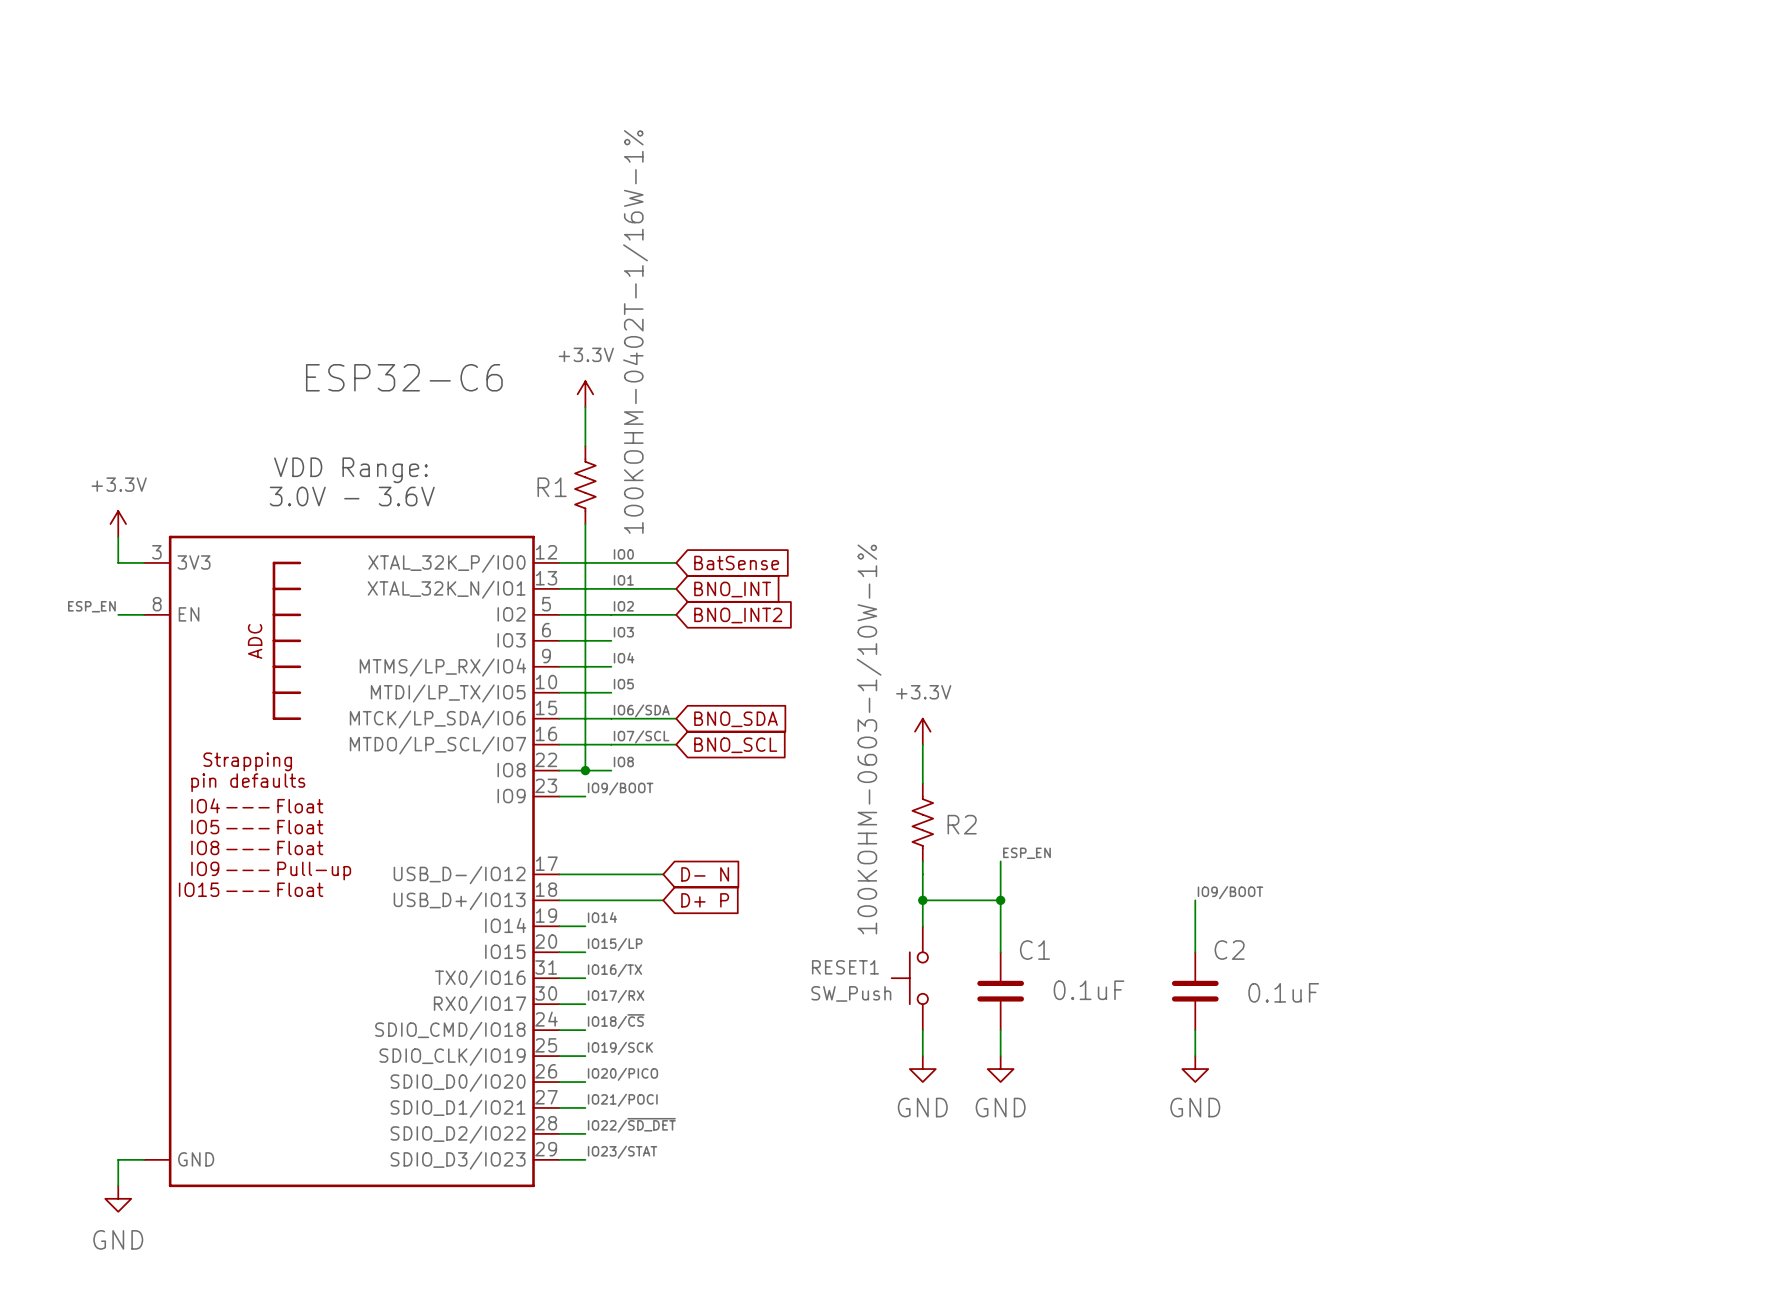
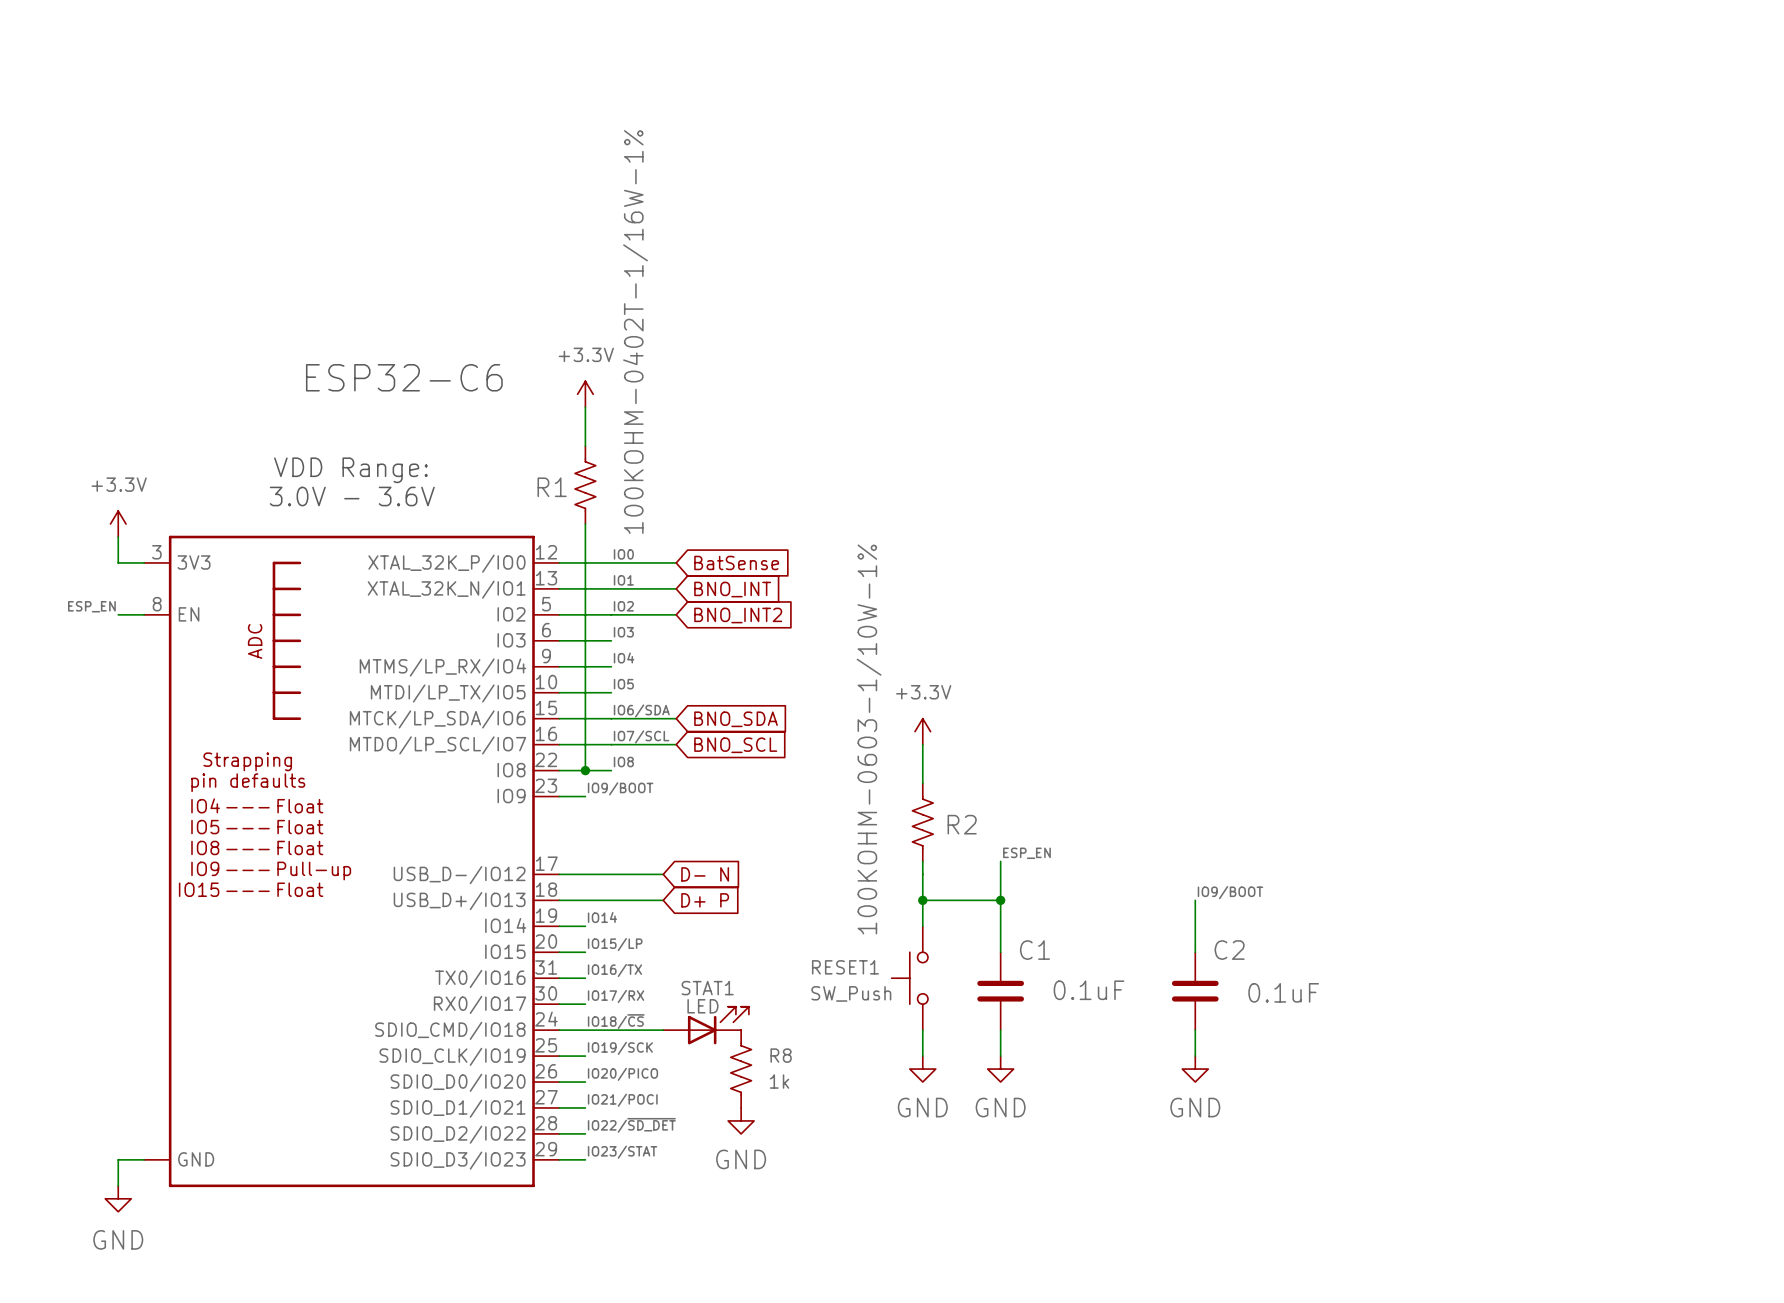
STAT1: none -> LED (706, 1025)
wire: none -> (585, 1030) (663, 1030)
R8: none -> 1k (741, 1069)
power symbol: none -> GND (741, 1120)

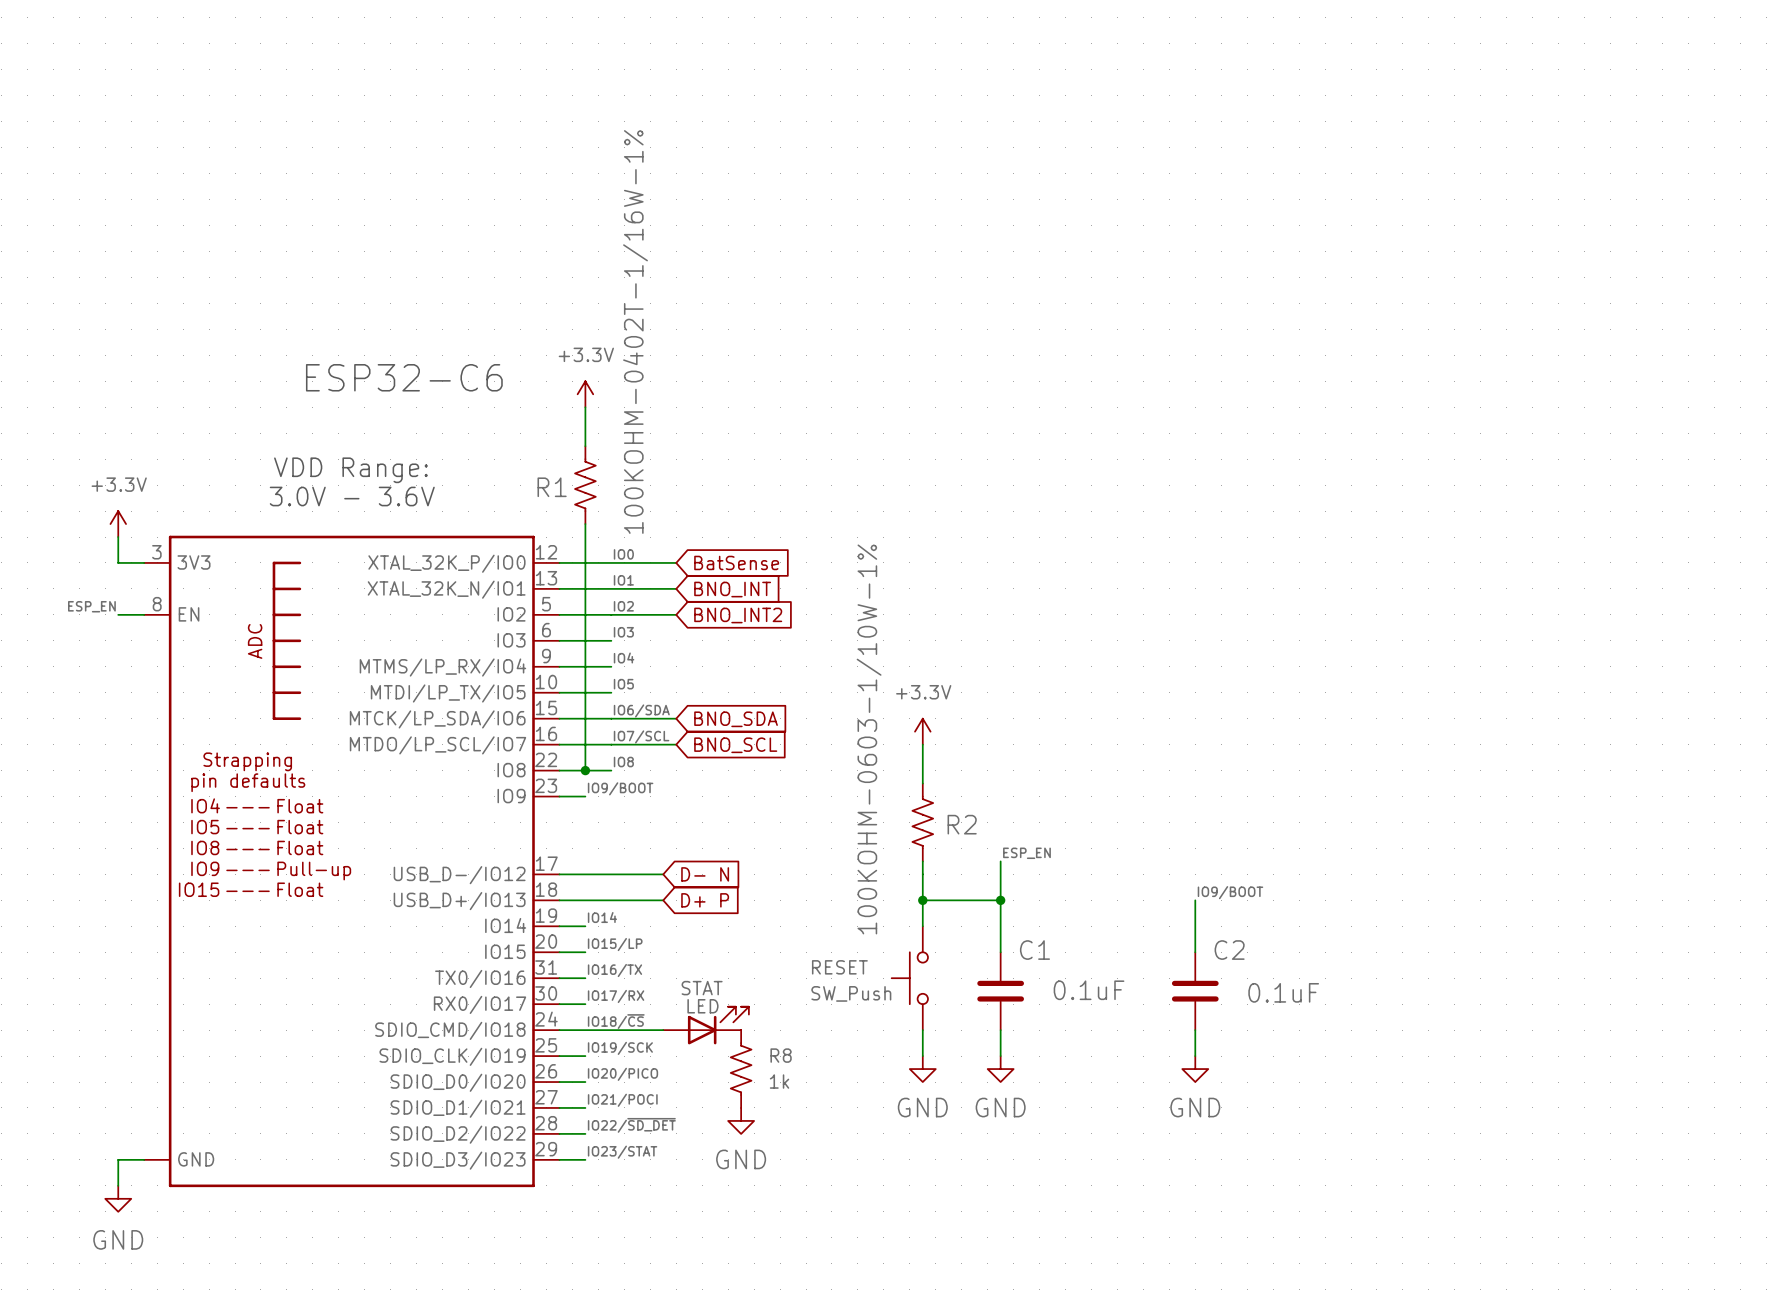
RESET1 name: RESET1 (845, 967) -> RESET (839, 967)
STAT1 name: STAT1 (707, 988) -> STAT (702, 988)

